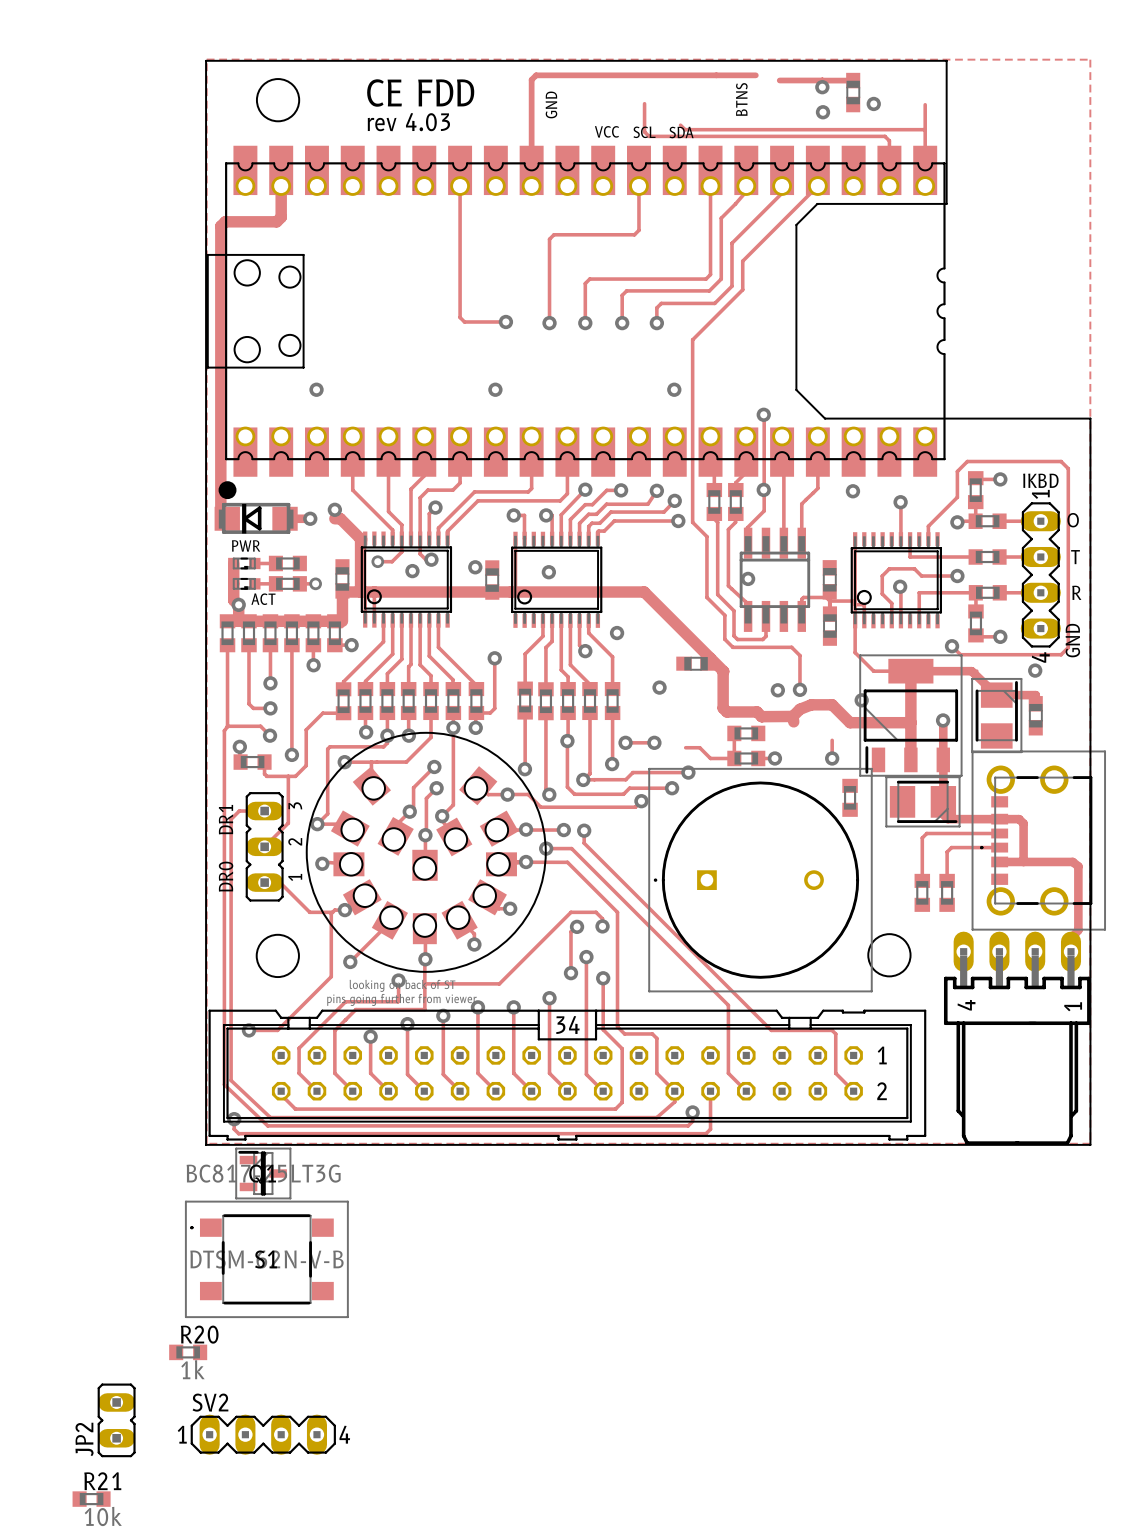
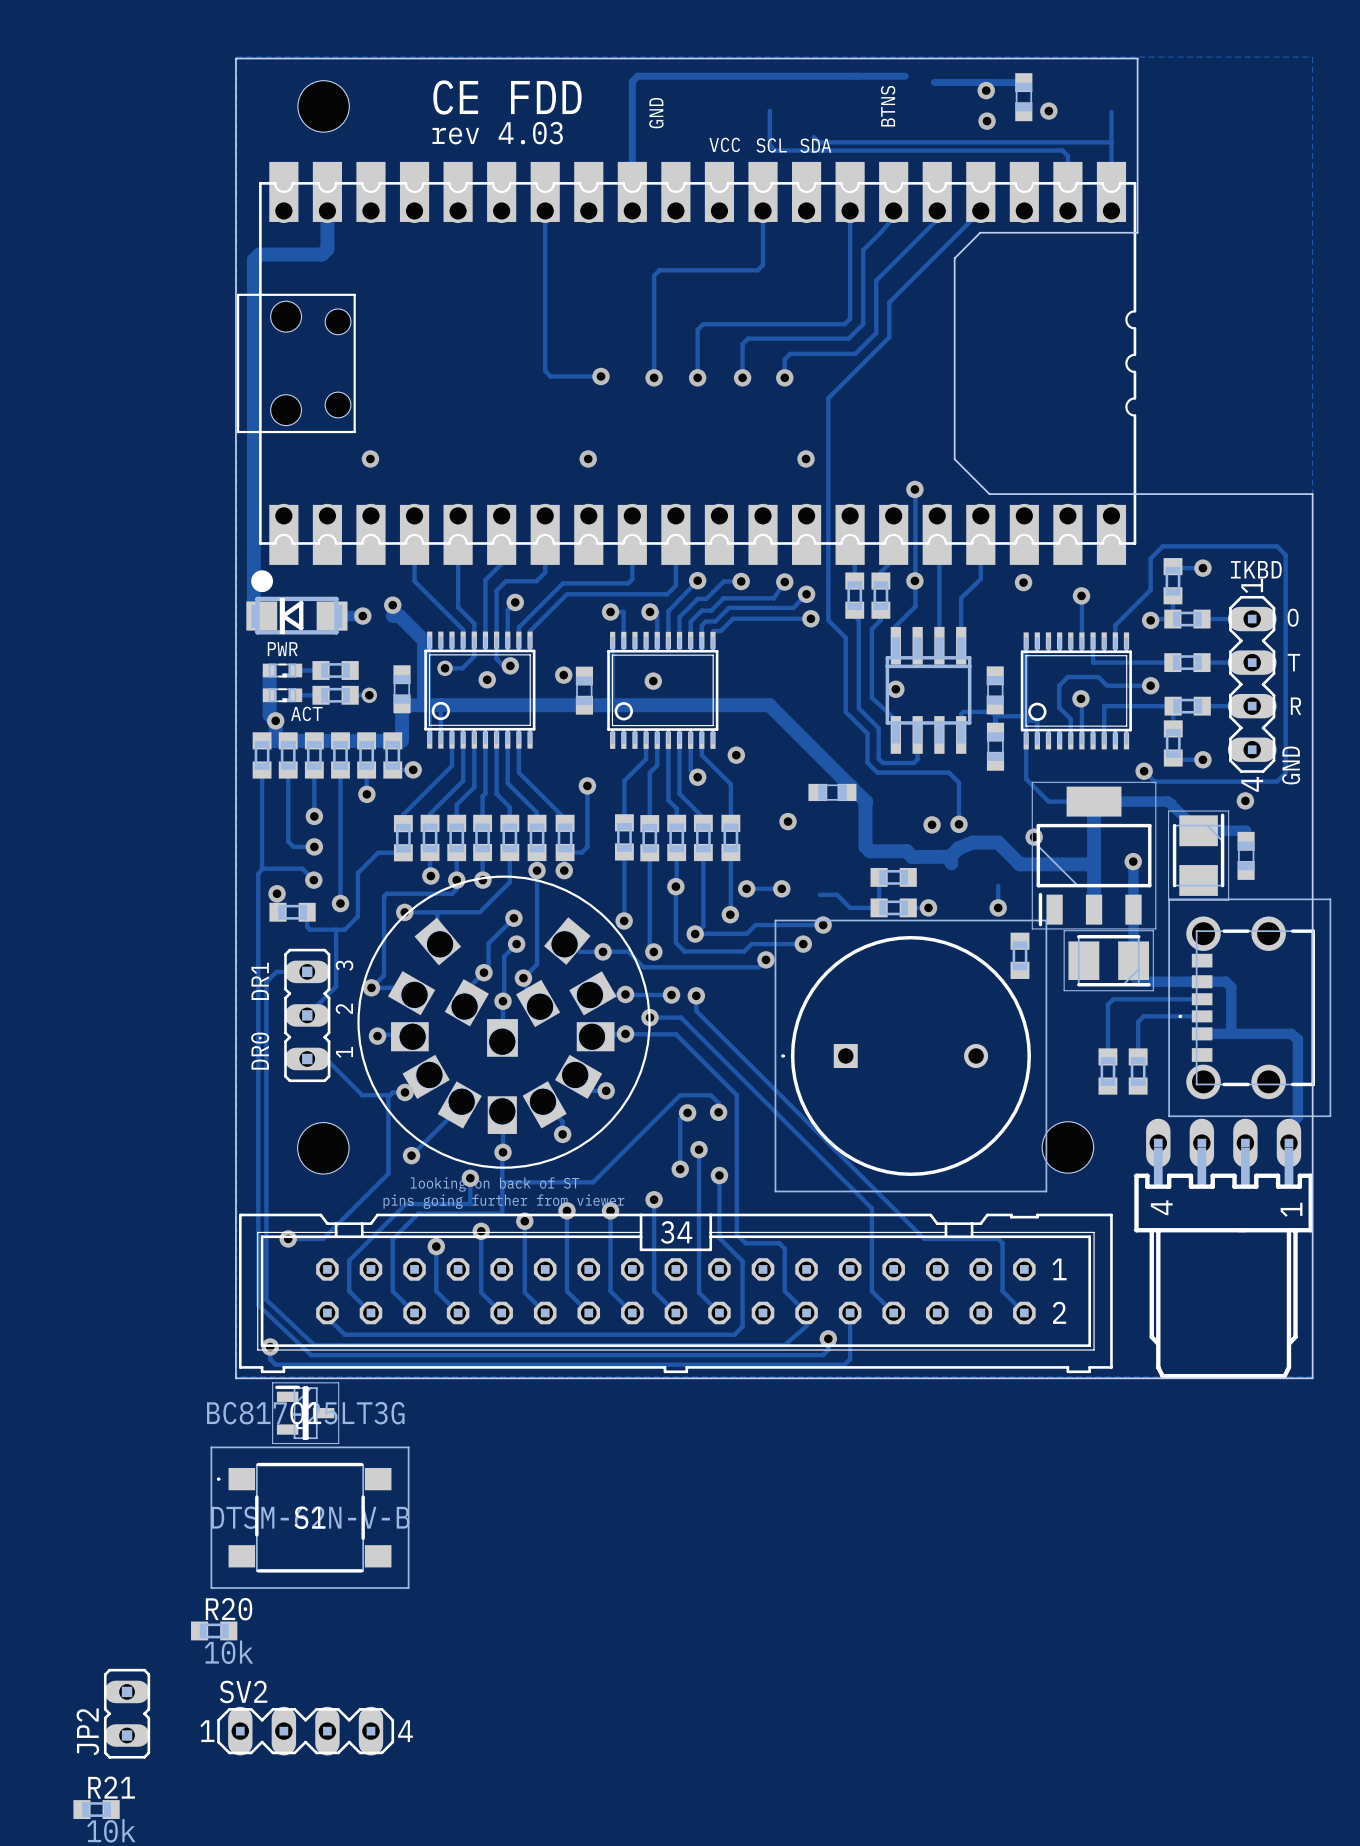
R20 value: 1k (192, 1369) -> 10k (228, 1652)

